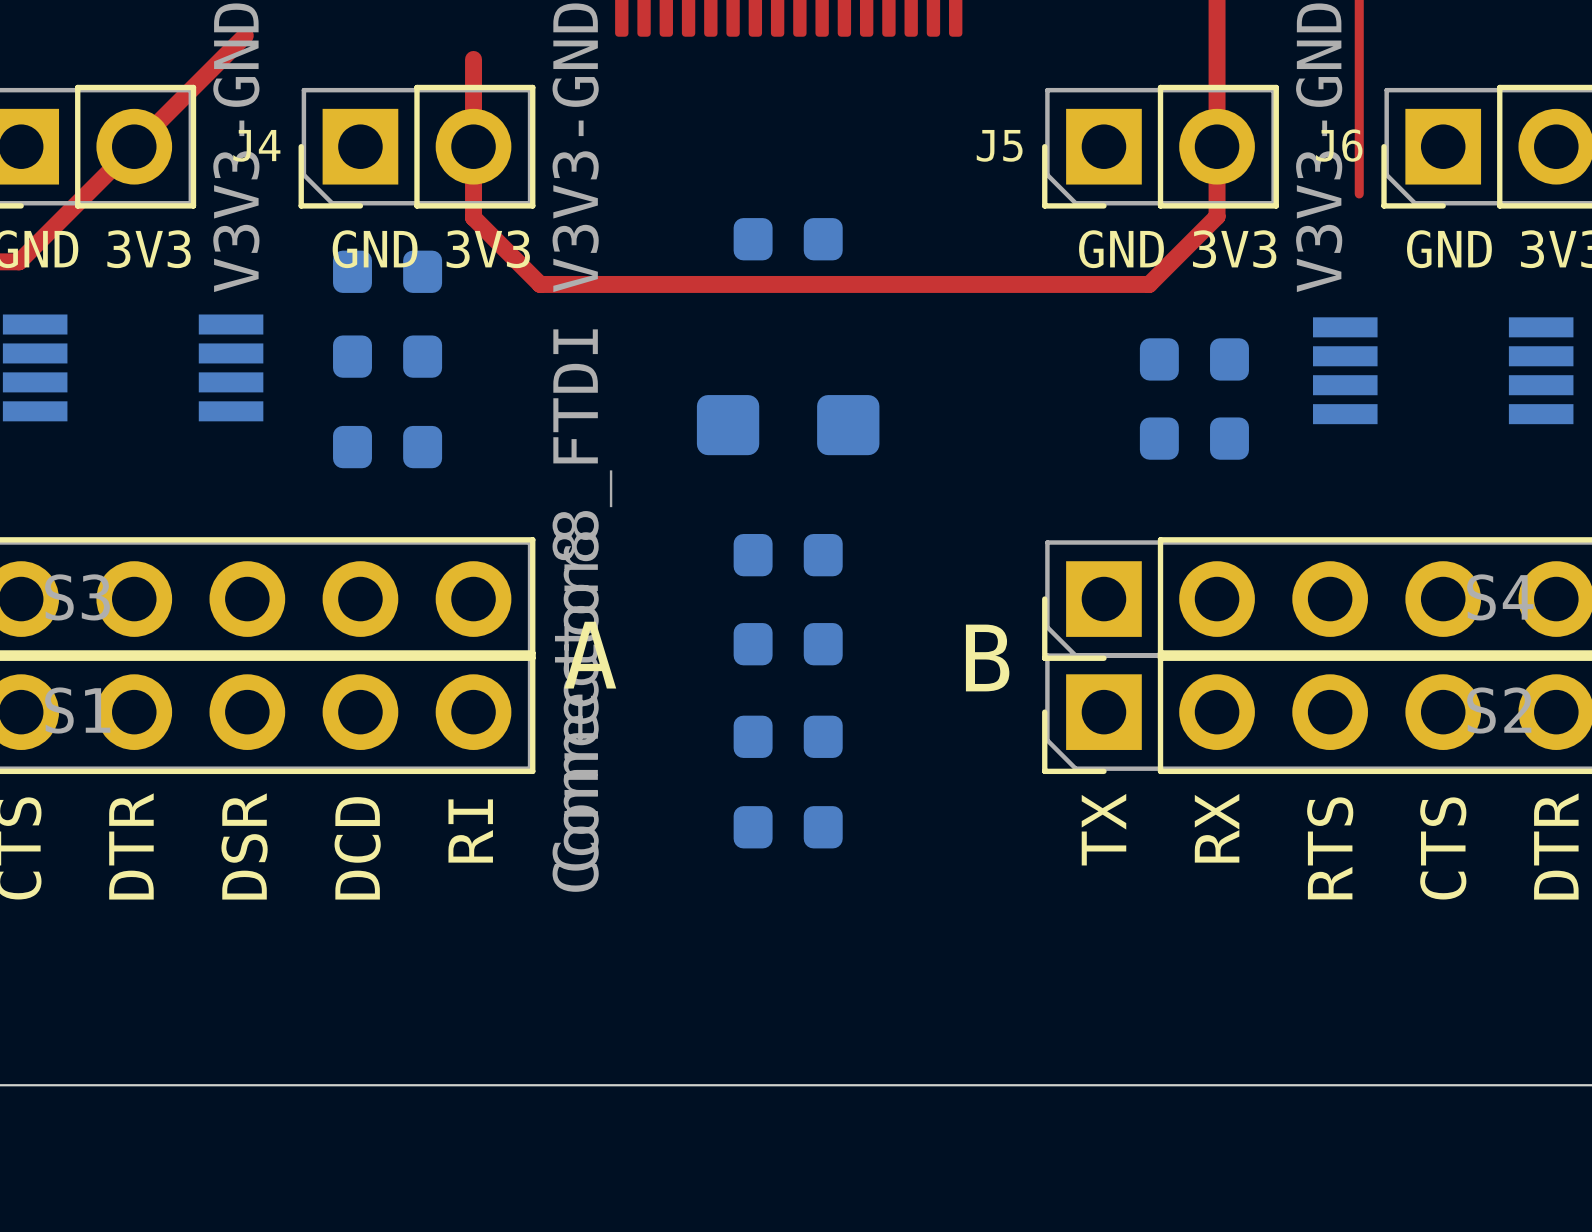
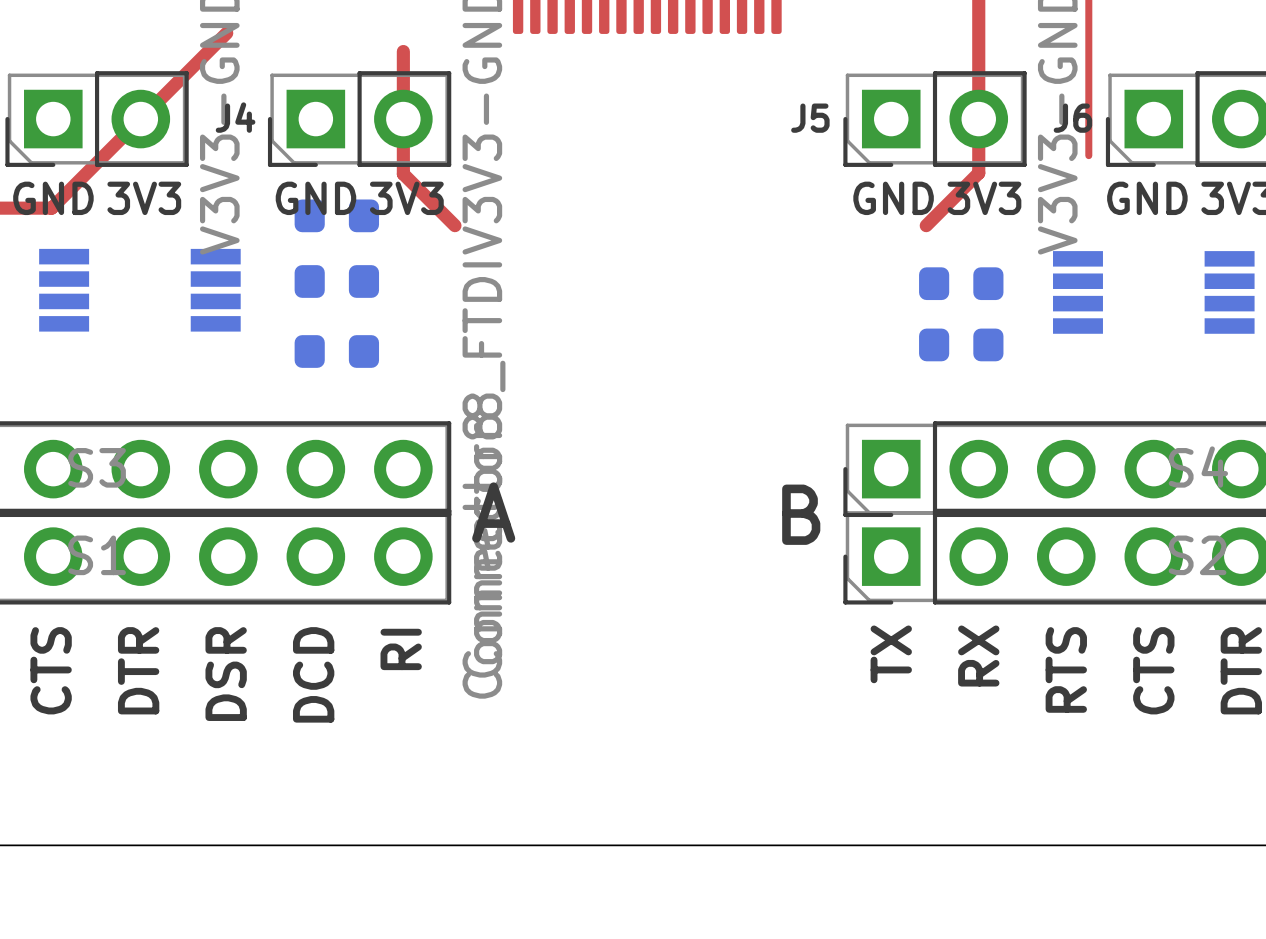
part: (788, 239) -> none
top track: (540, 284) (1149, 284) -> none
part: (788, 425) -> none
part: (788, 555) -> none
part: (788, 644) -> none
part: (788, 736) -> none
part: (788, 827) -> none

